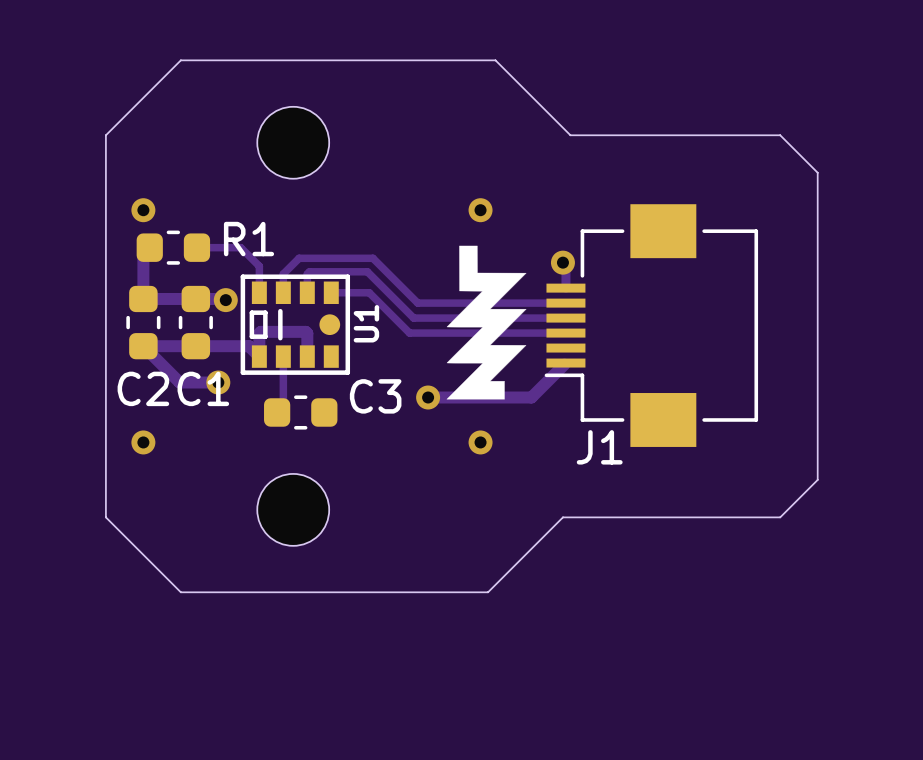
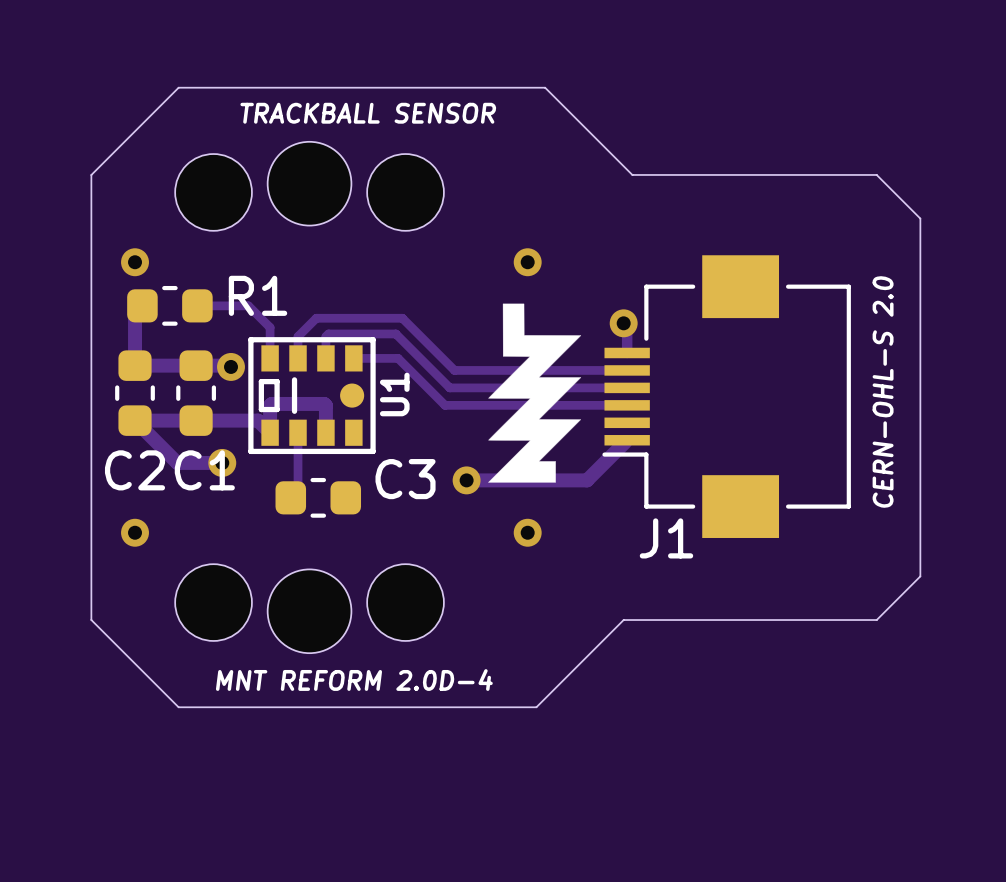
text: none -> TRACKBALL SENSOR (368, 113)
part: none -> (213, 192)
part: none -> (405, 192)
text: none -> CERN-OHL-S 2.0 (883, 391)
part: none -> (213, 602)
part: none -> (405, 602)
text: none -> MNT REFORM 2.0D-4 (354, 680)

